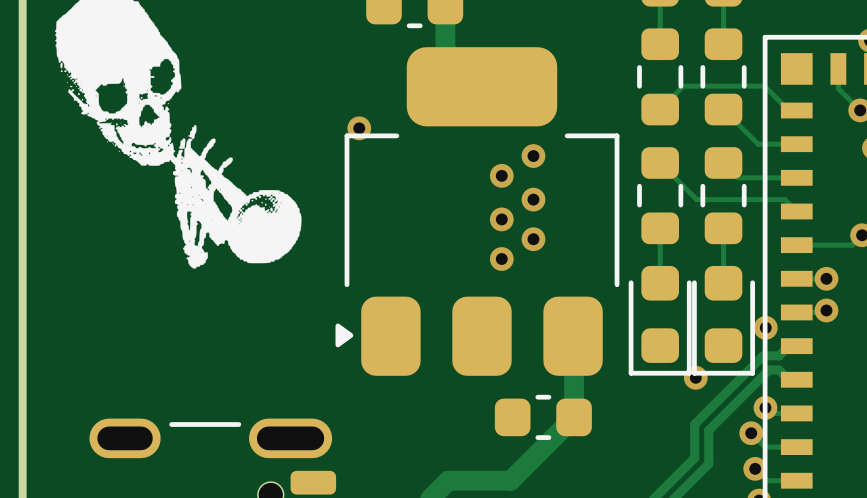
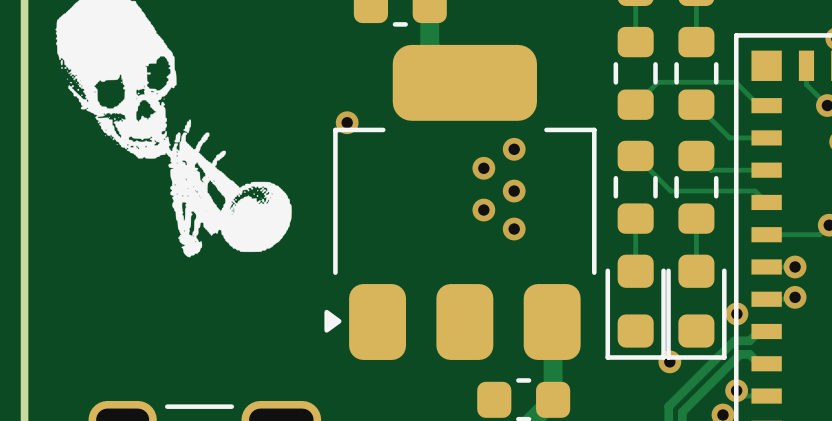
via: (501, 259) -> none

